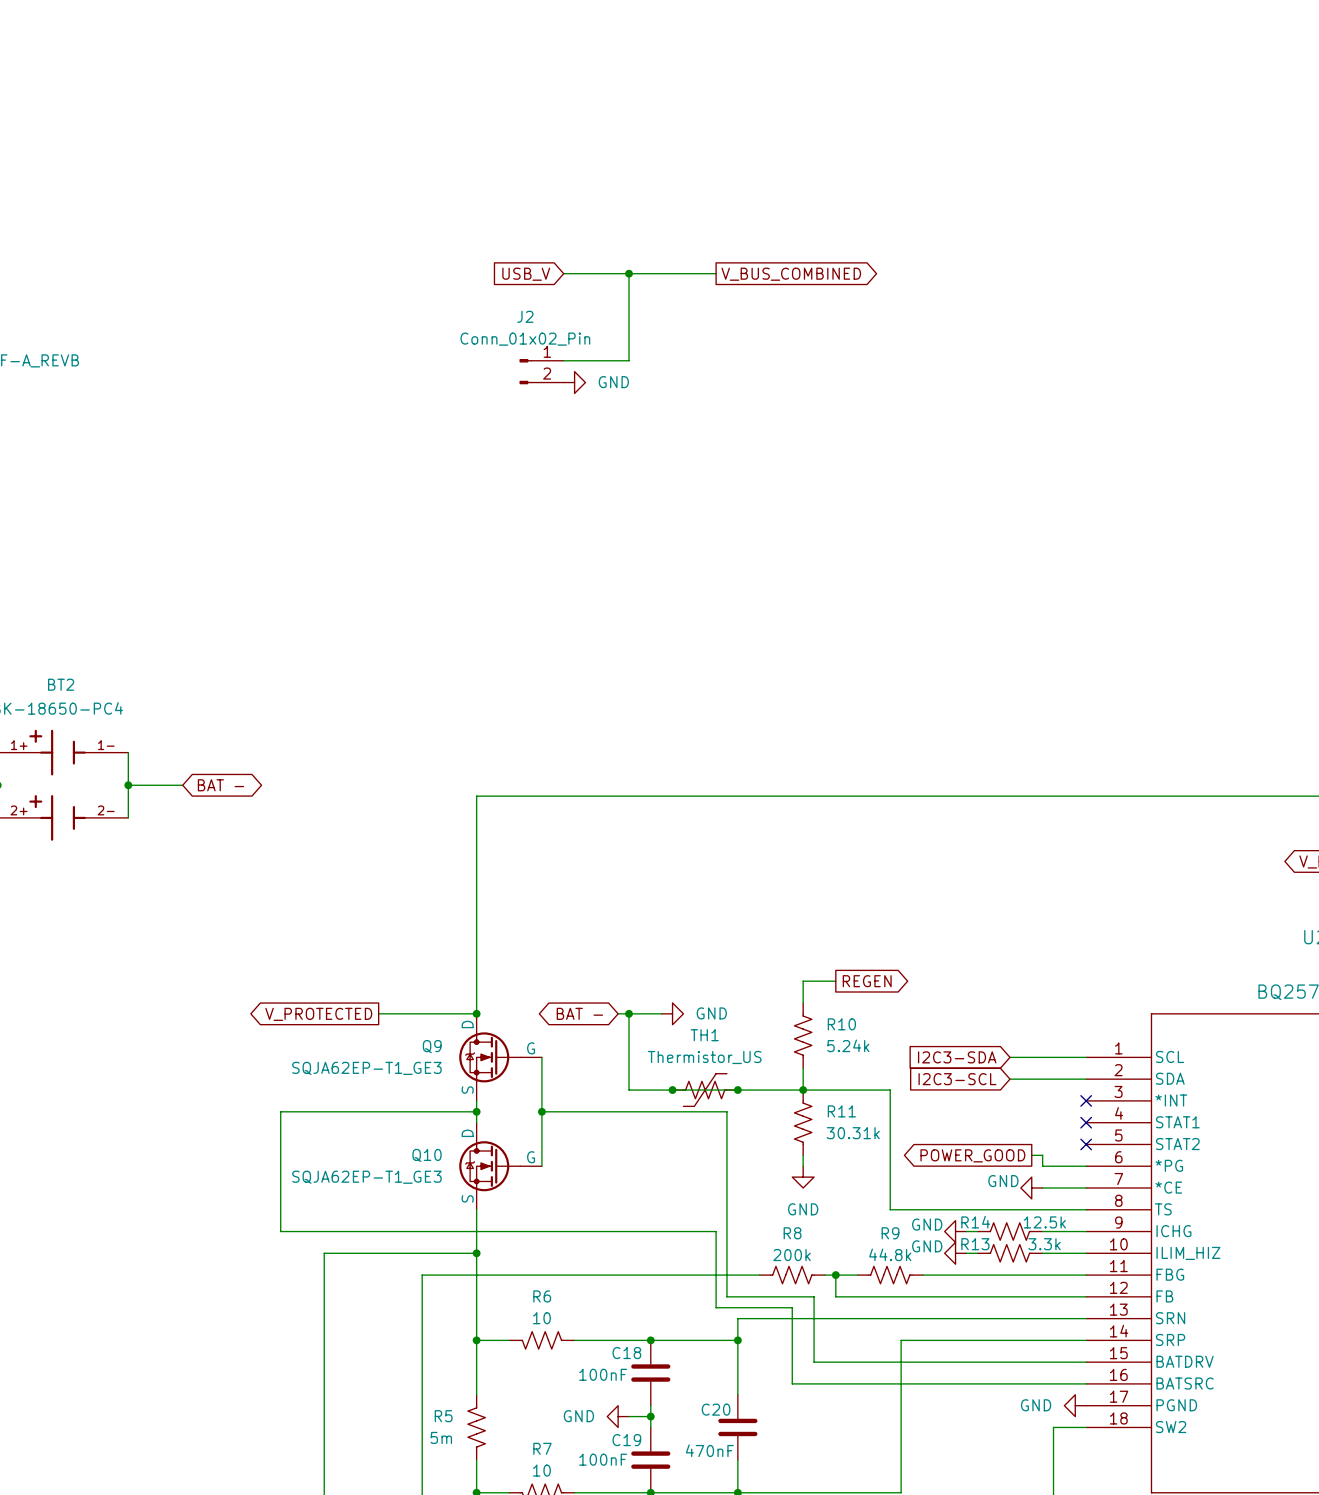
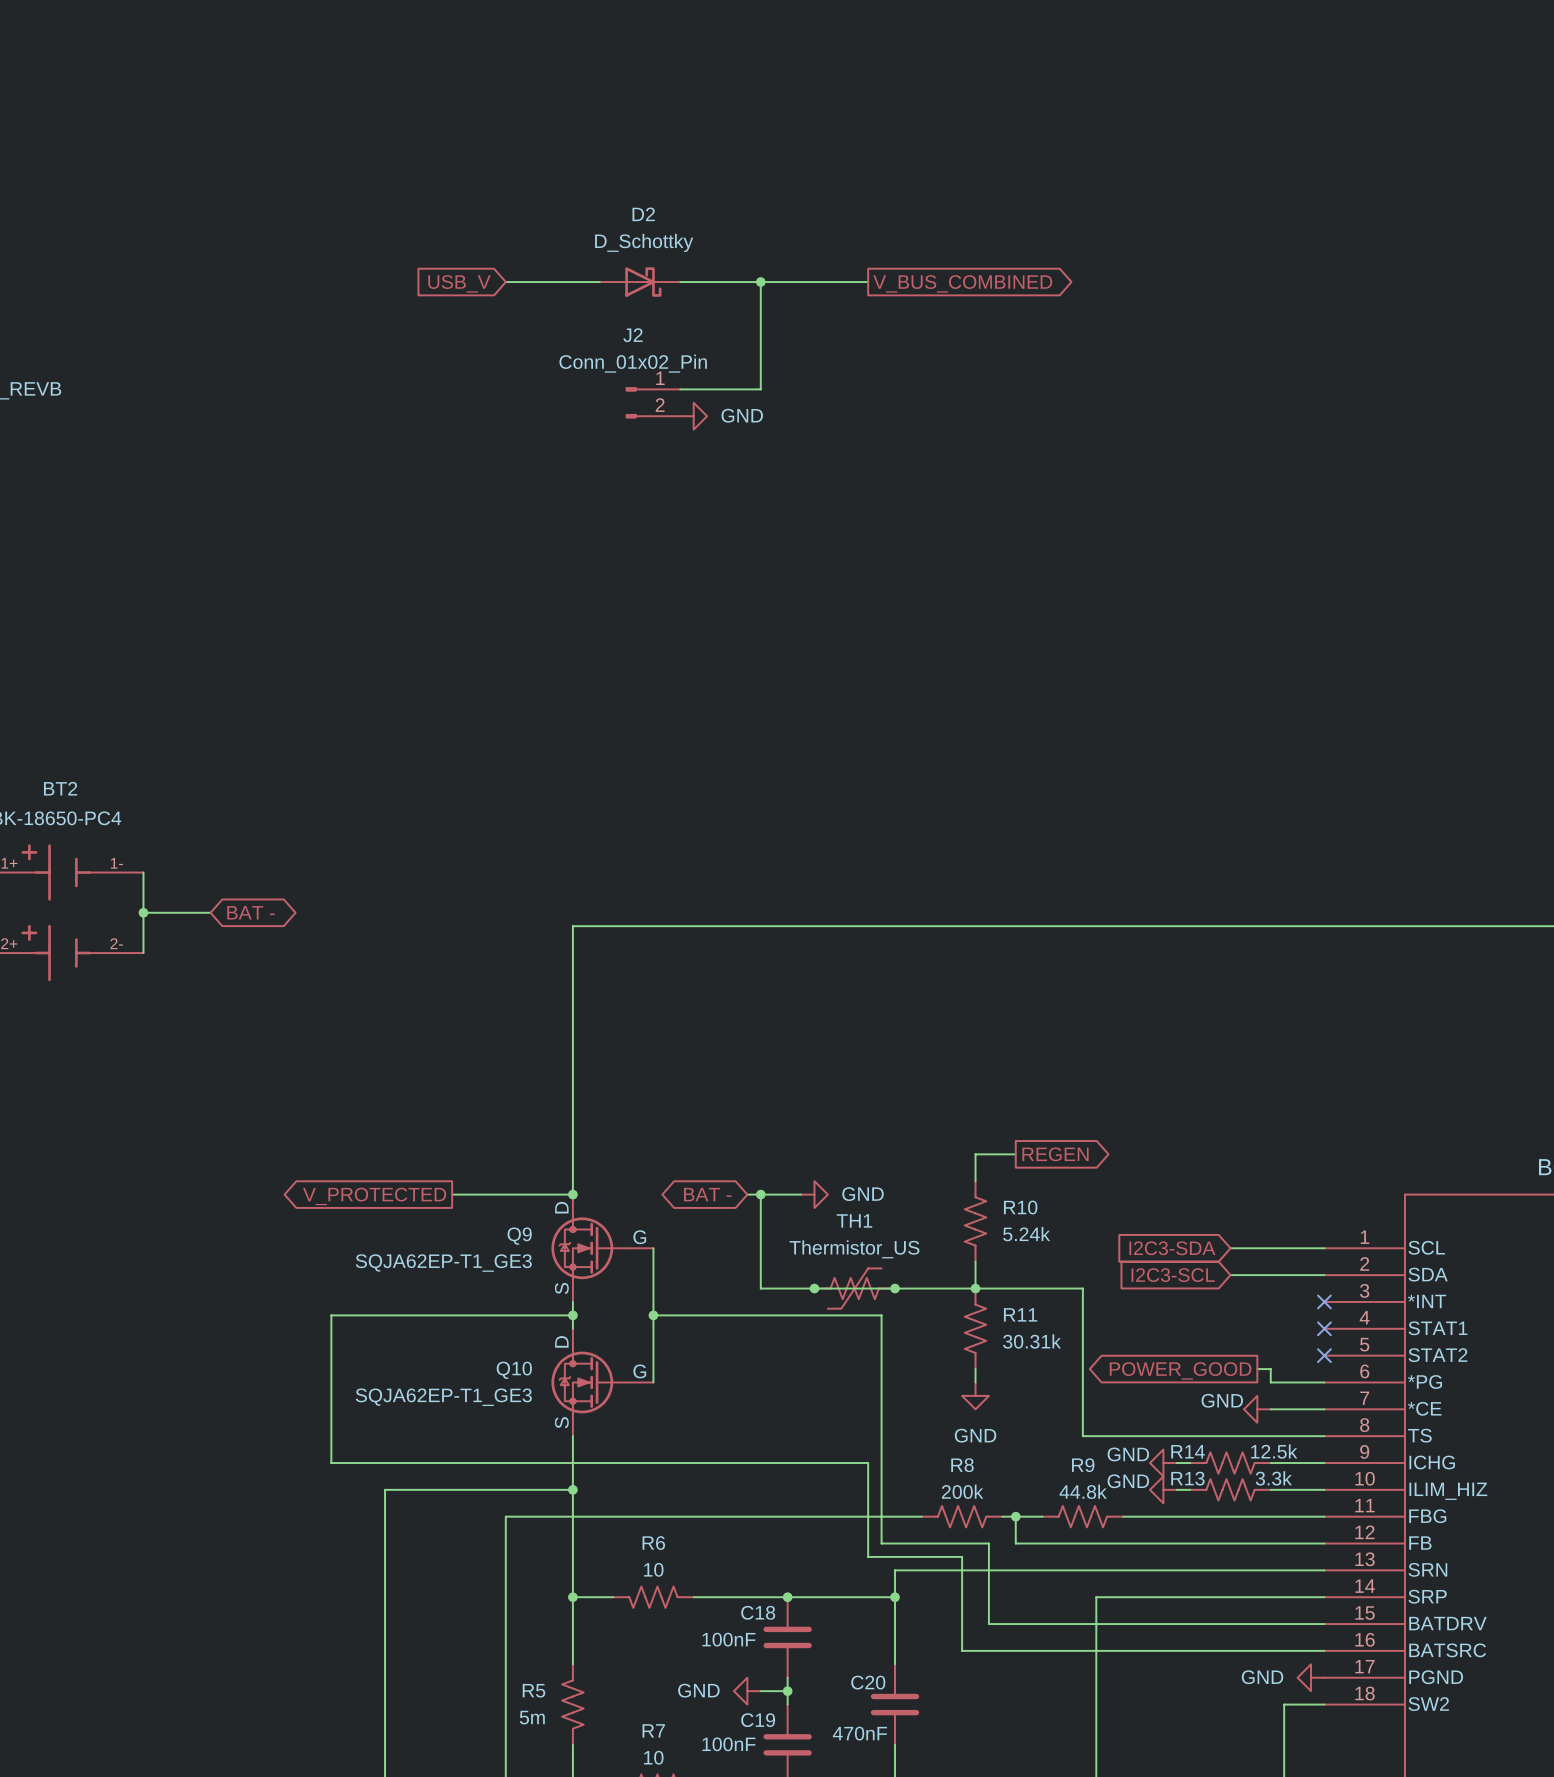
wire: none -> (505, 282) (599, 282)
D2: none -> D_Schottky (640, 282)
global label position: USB_V (526, 274) -> USB_V (459, 283)

